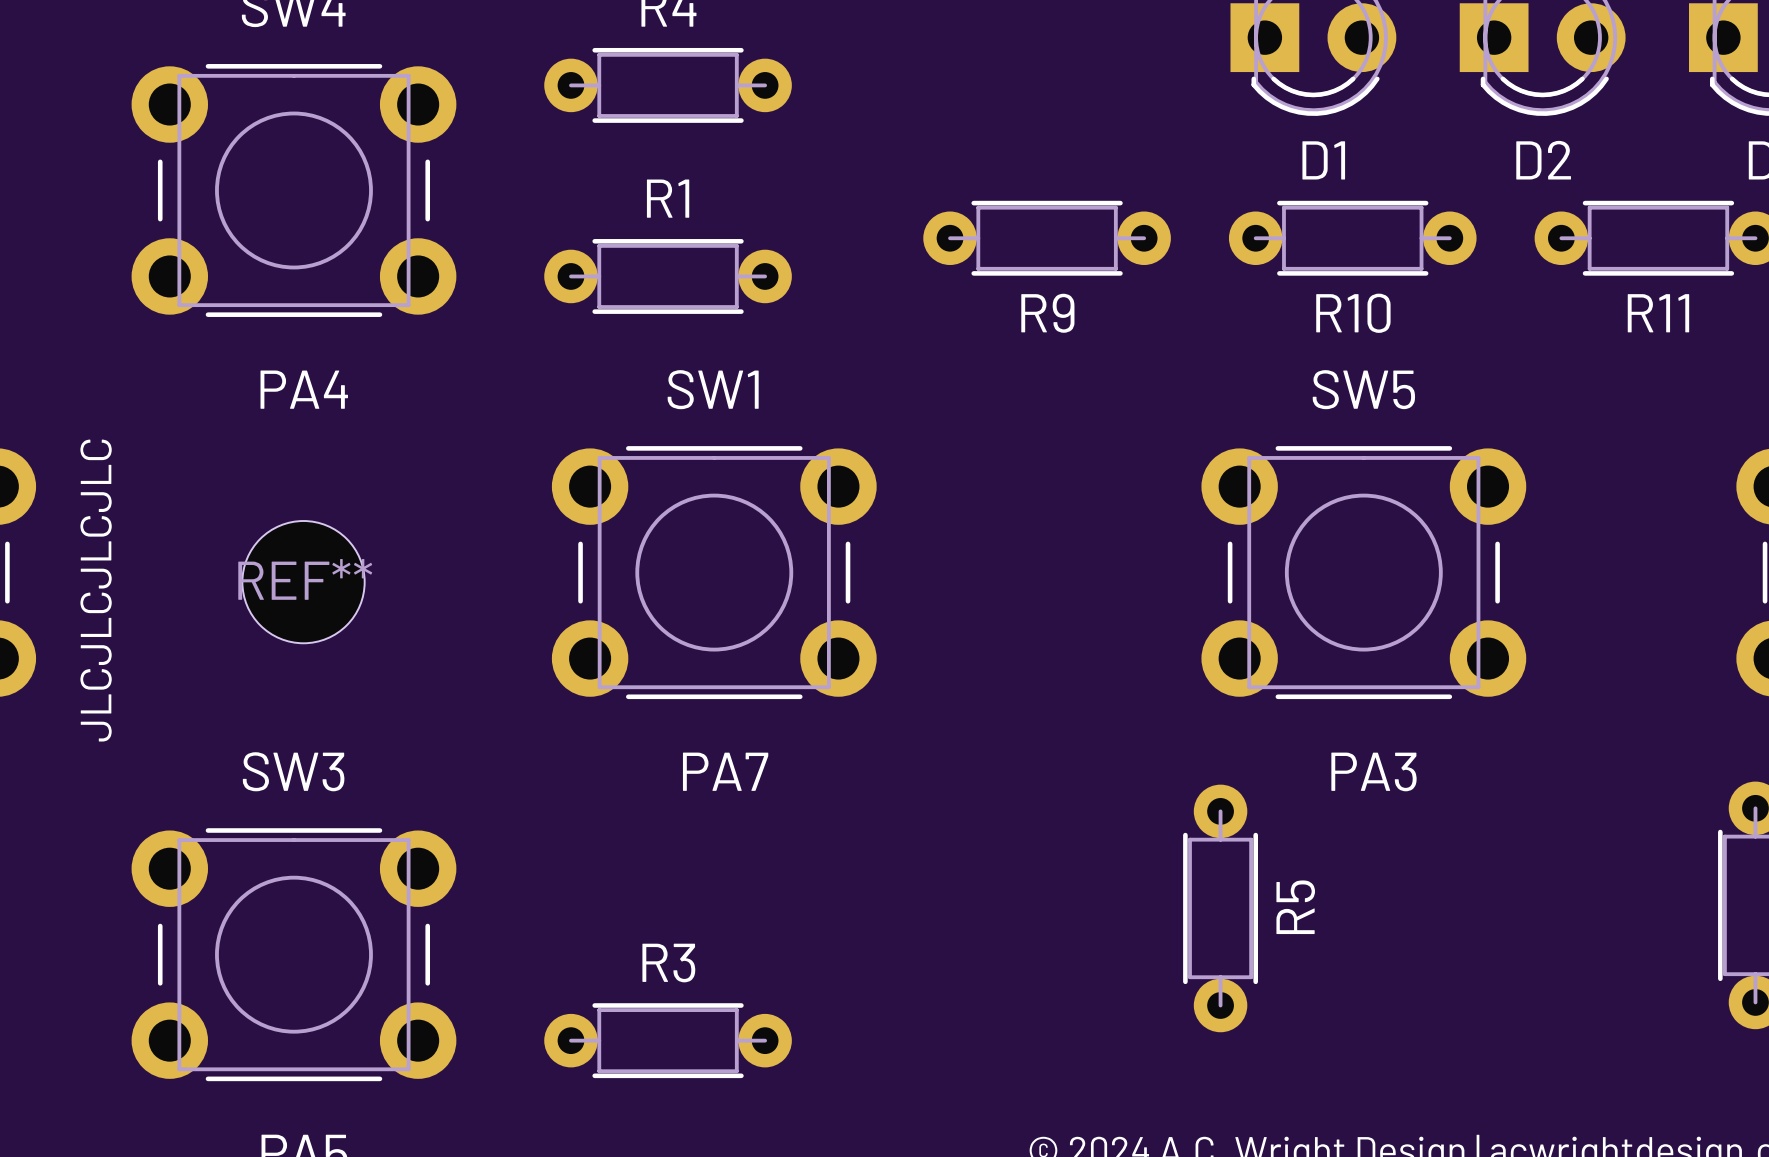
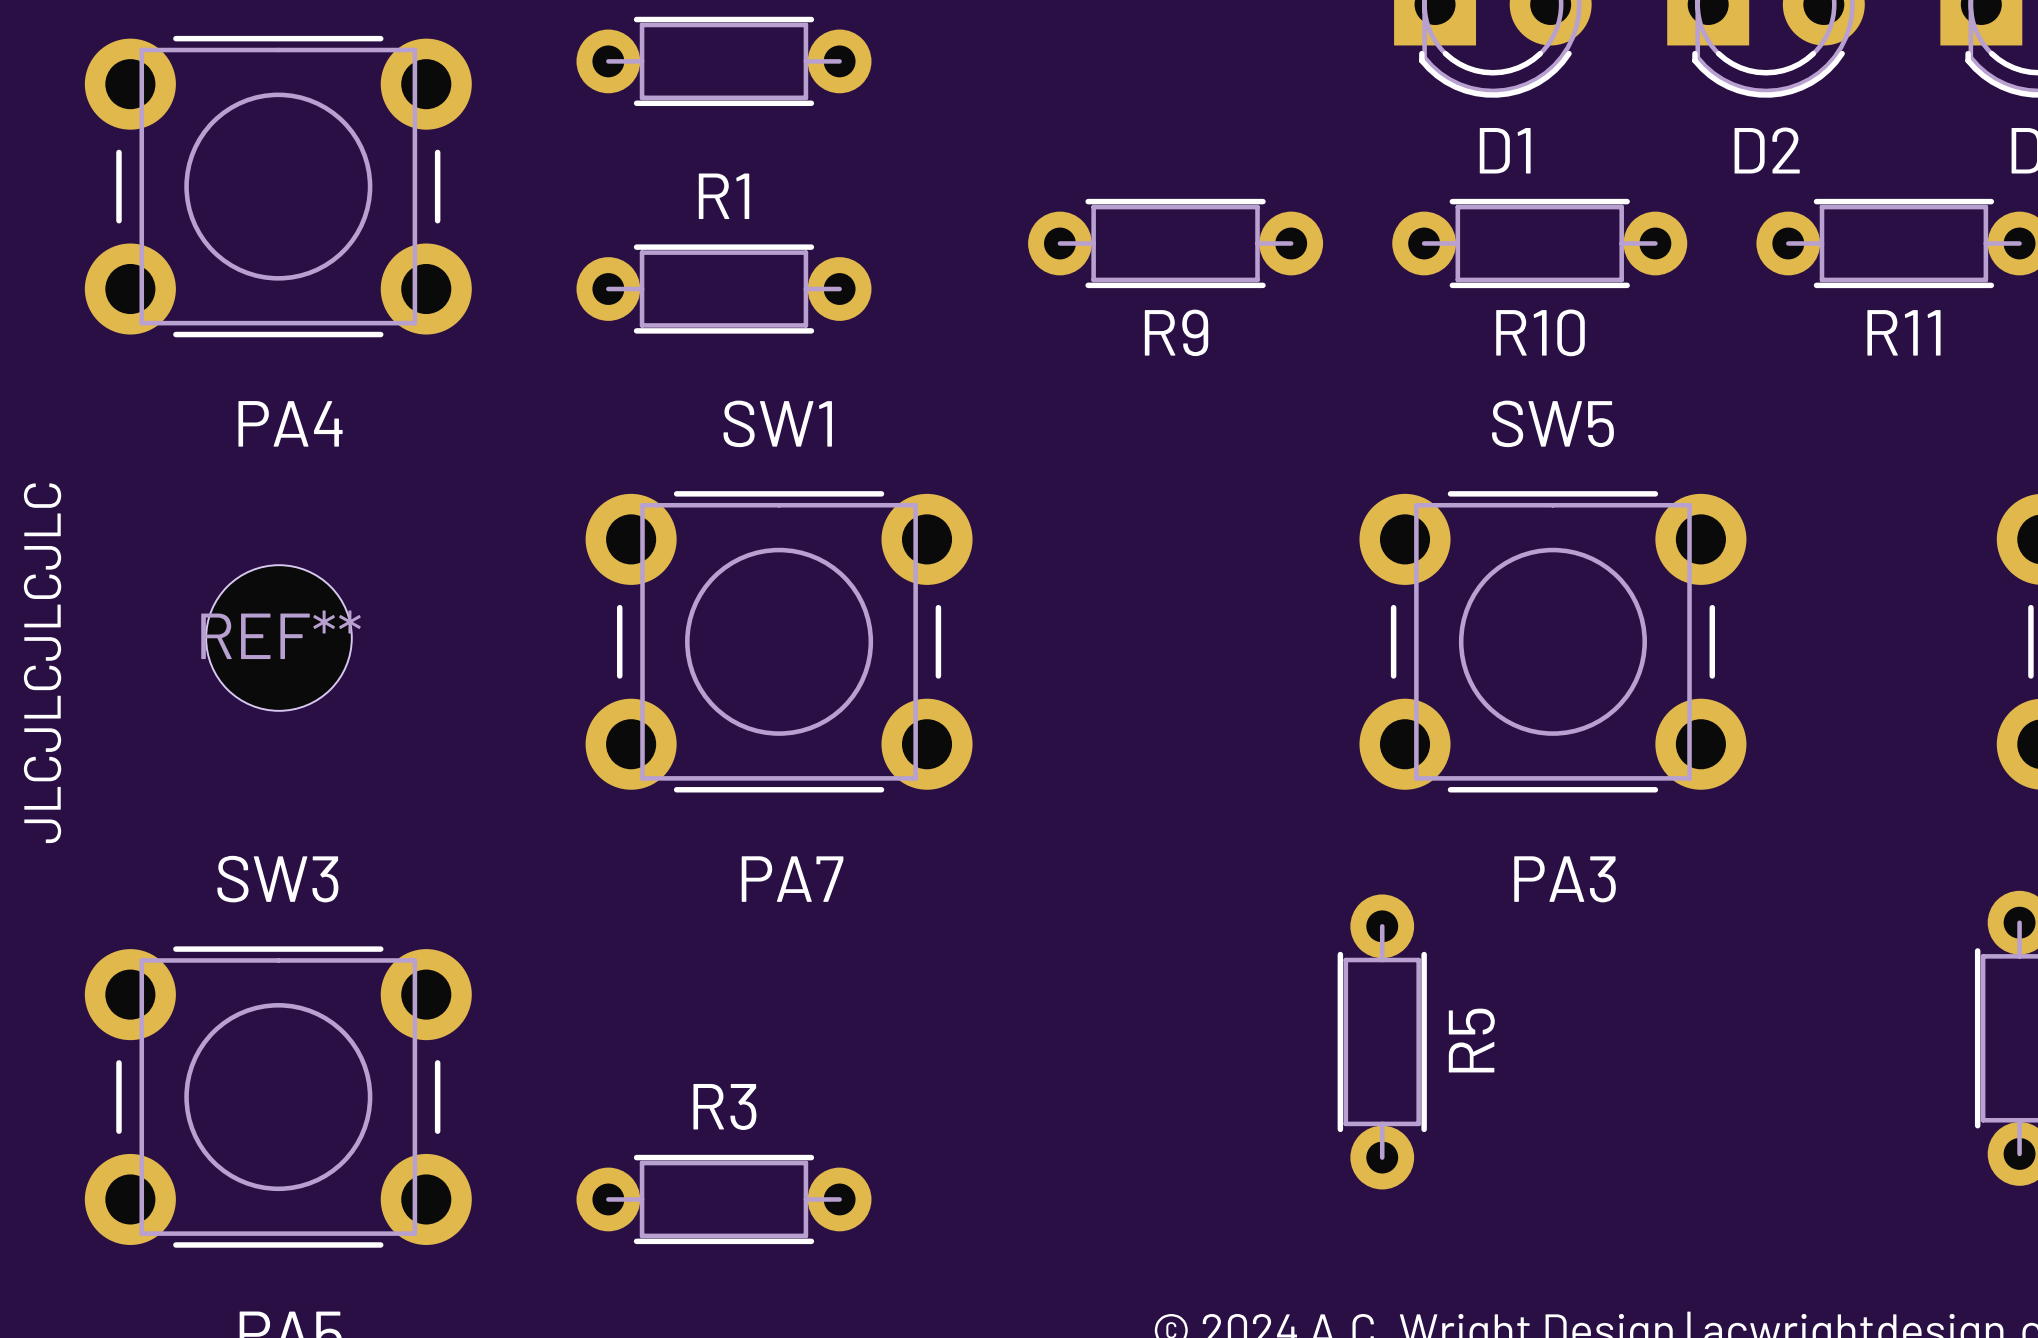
REF** position: (303, 582) -> (278, 638)

